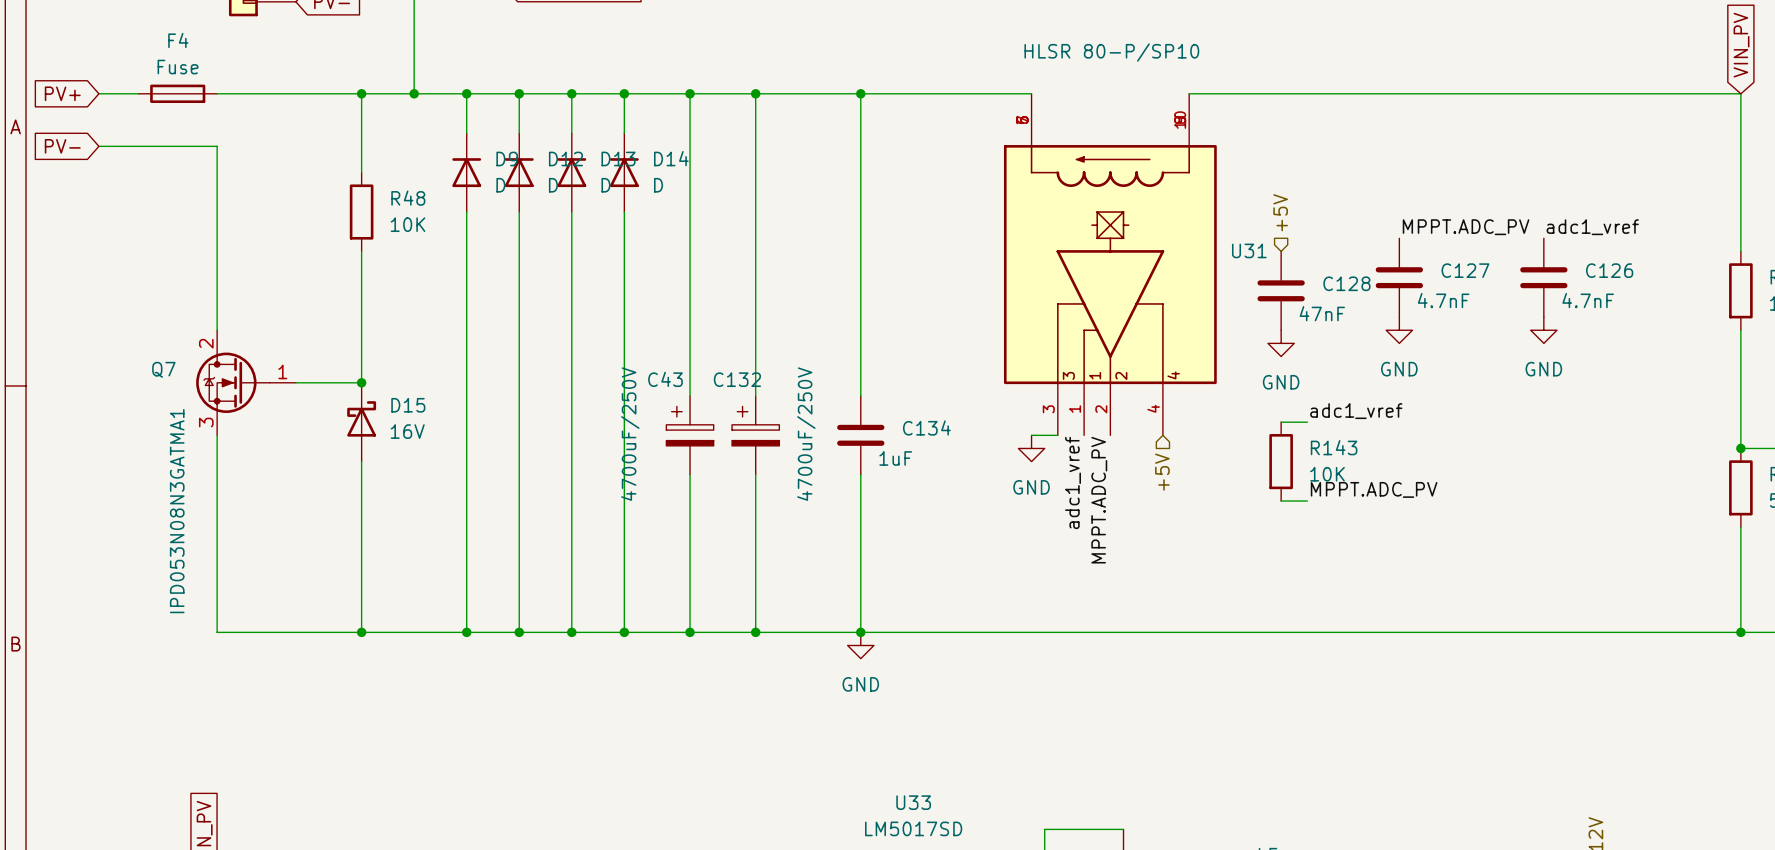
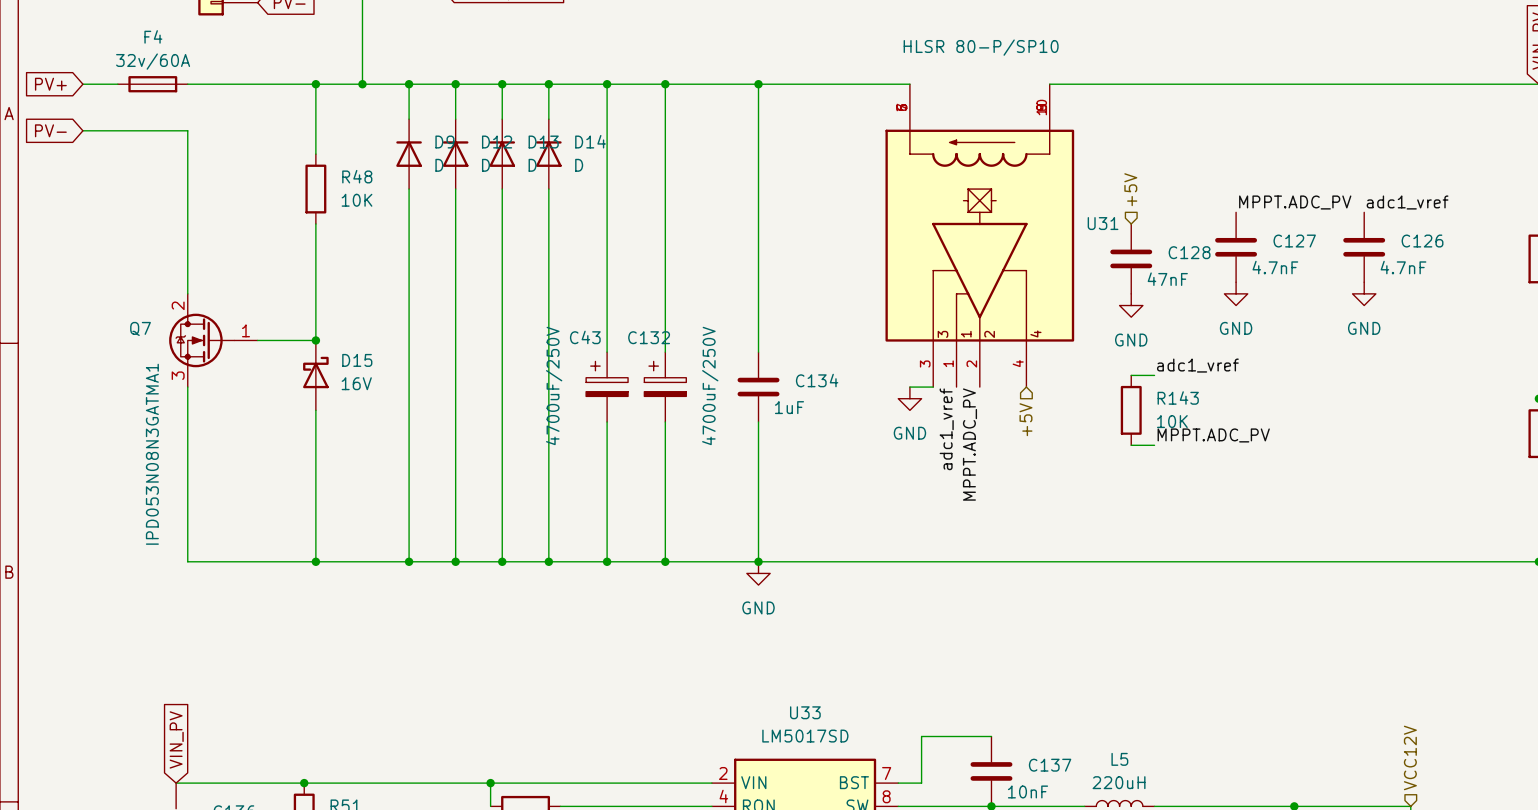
F4 value: Fuse (178, 67) -> 32v/60A (153, 61)

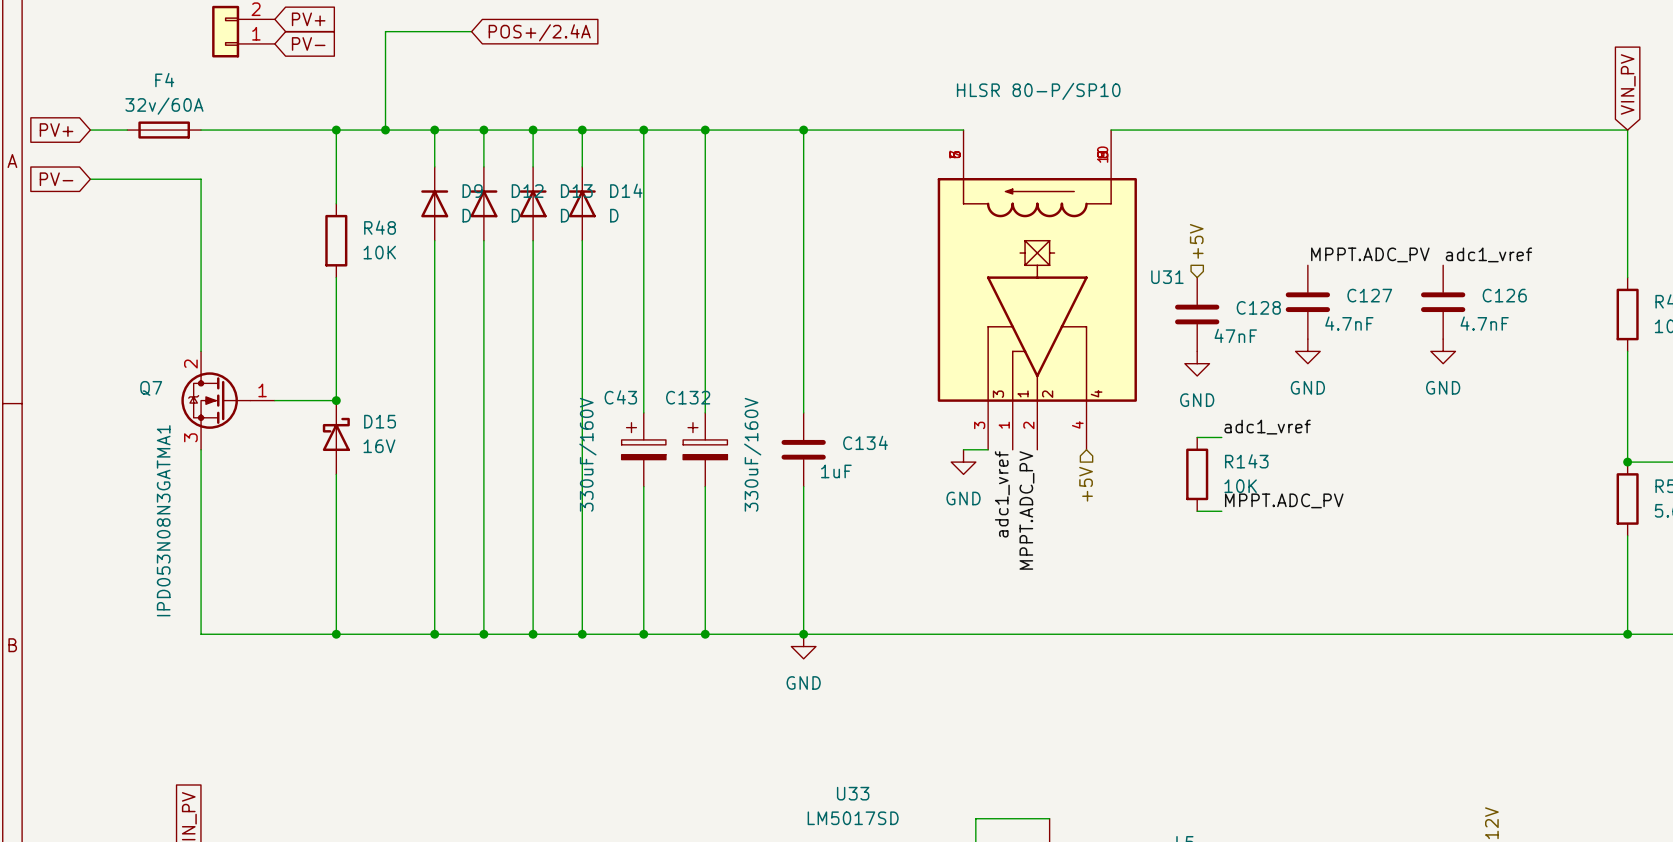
C43 value: 4700uF/250V (554, 385) -> 330uF/160V (587, 454)
C132 value: 4700uF/250V (710, 385) -> 330uF/160V (752, 454)

